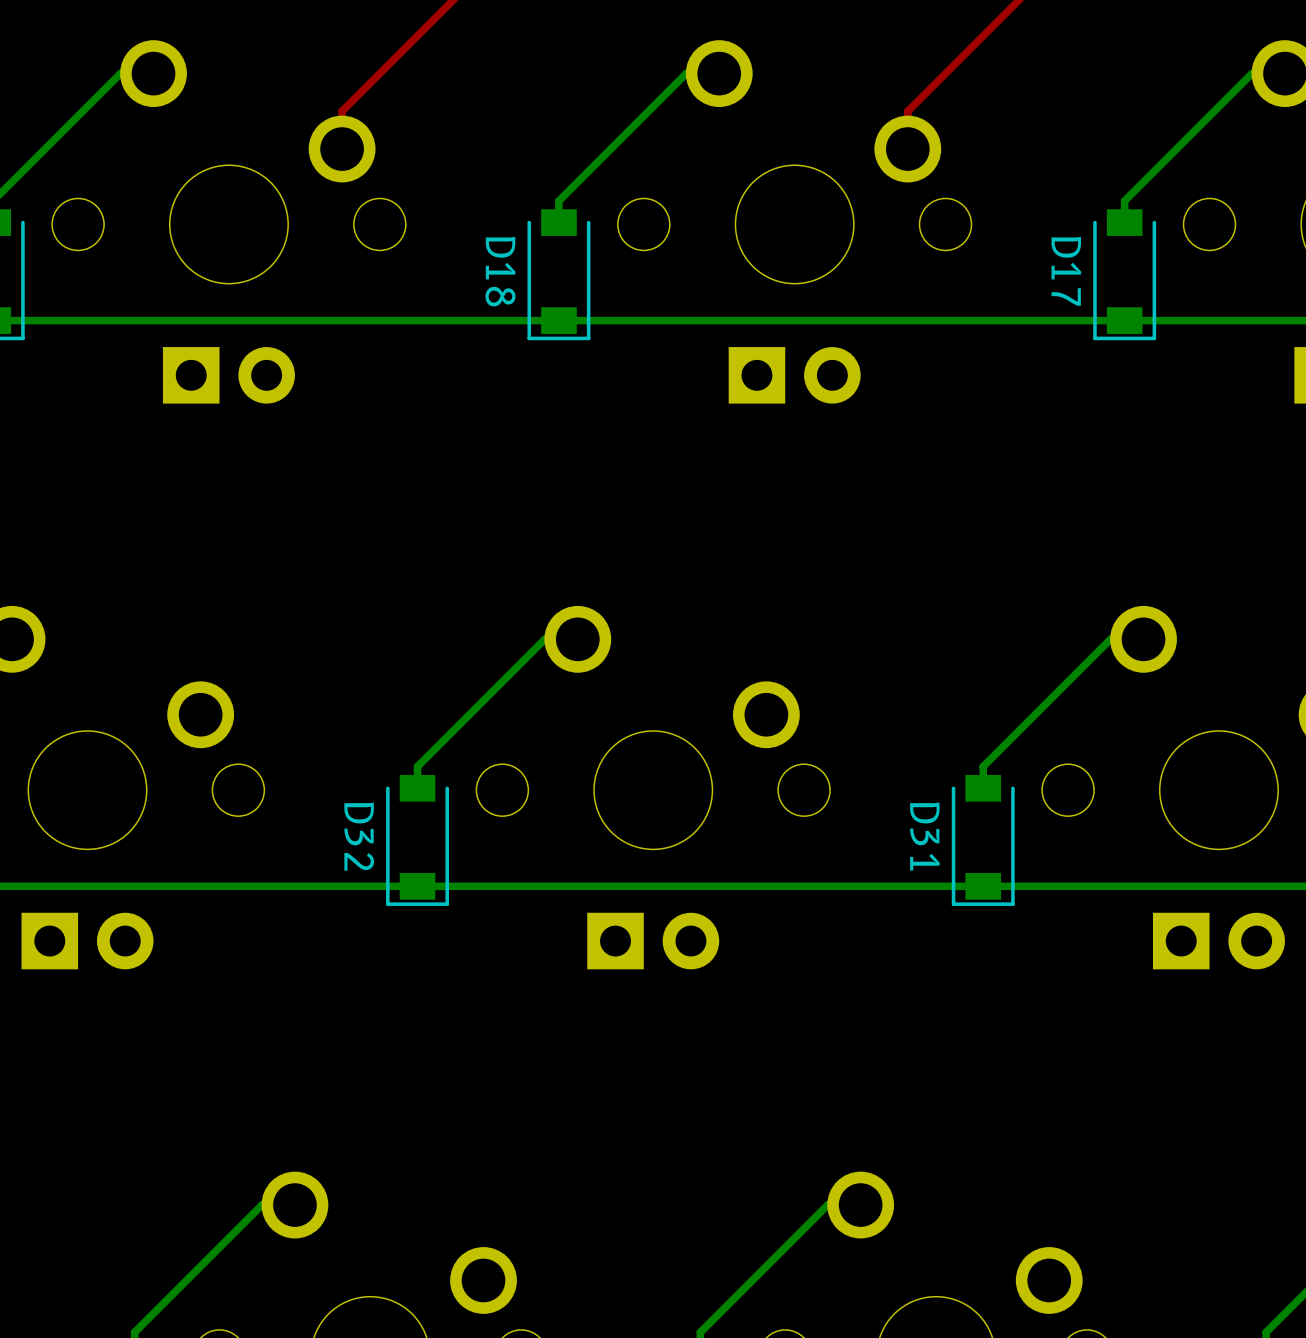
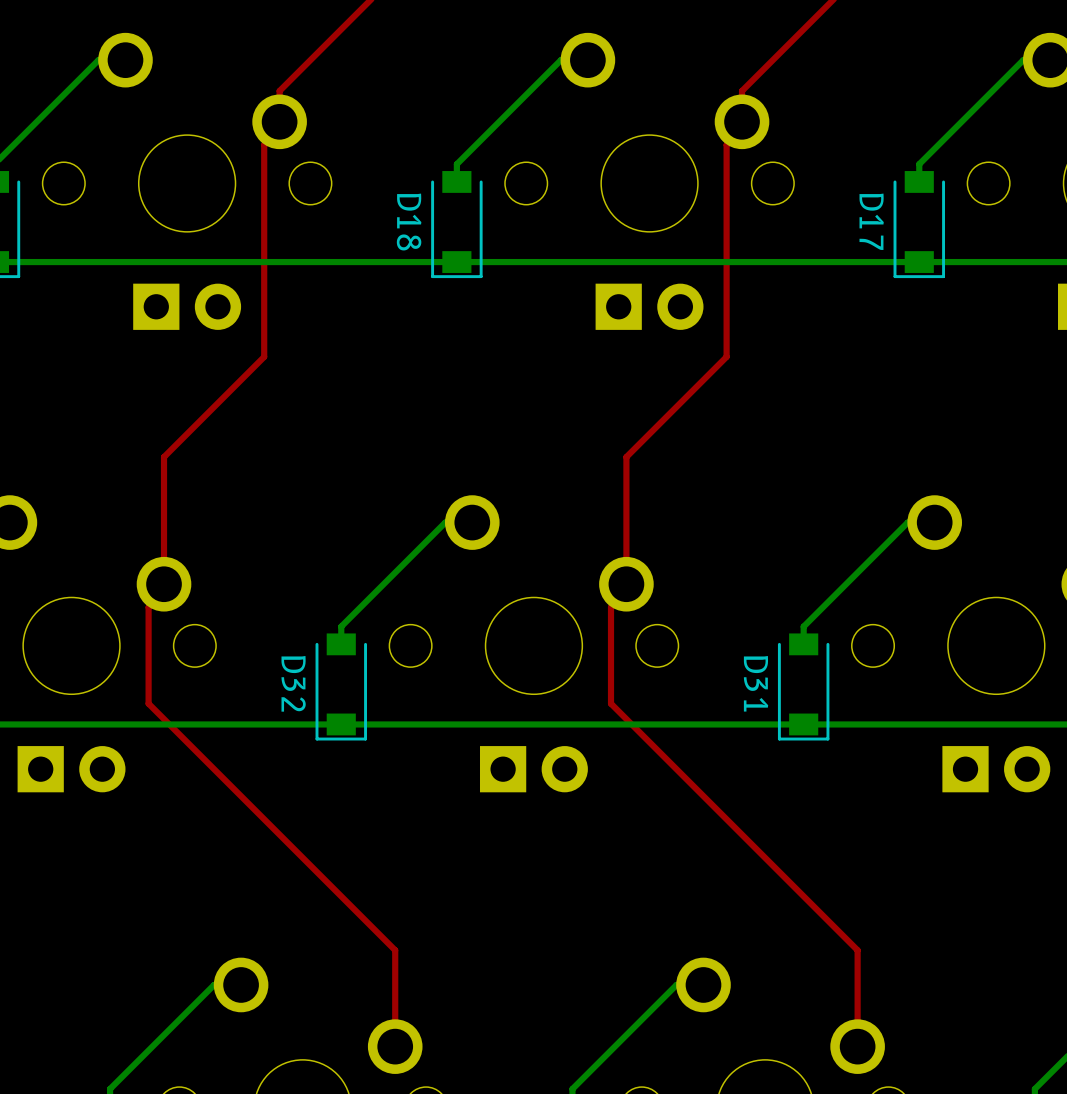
top track: none -> (279, 121) (279, 129) (264, 144) (264, 356) (164, 457) (164, 591) (148, 607) (148, 703) (395, 950) (395, 1046)
top track: none -> (742, 121) (742, 129) (726, 144) (726, 356) (626, 457) (626, 591) (611, 607) (611, 703) (857, 950) (857, 1046)

